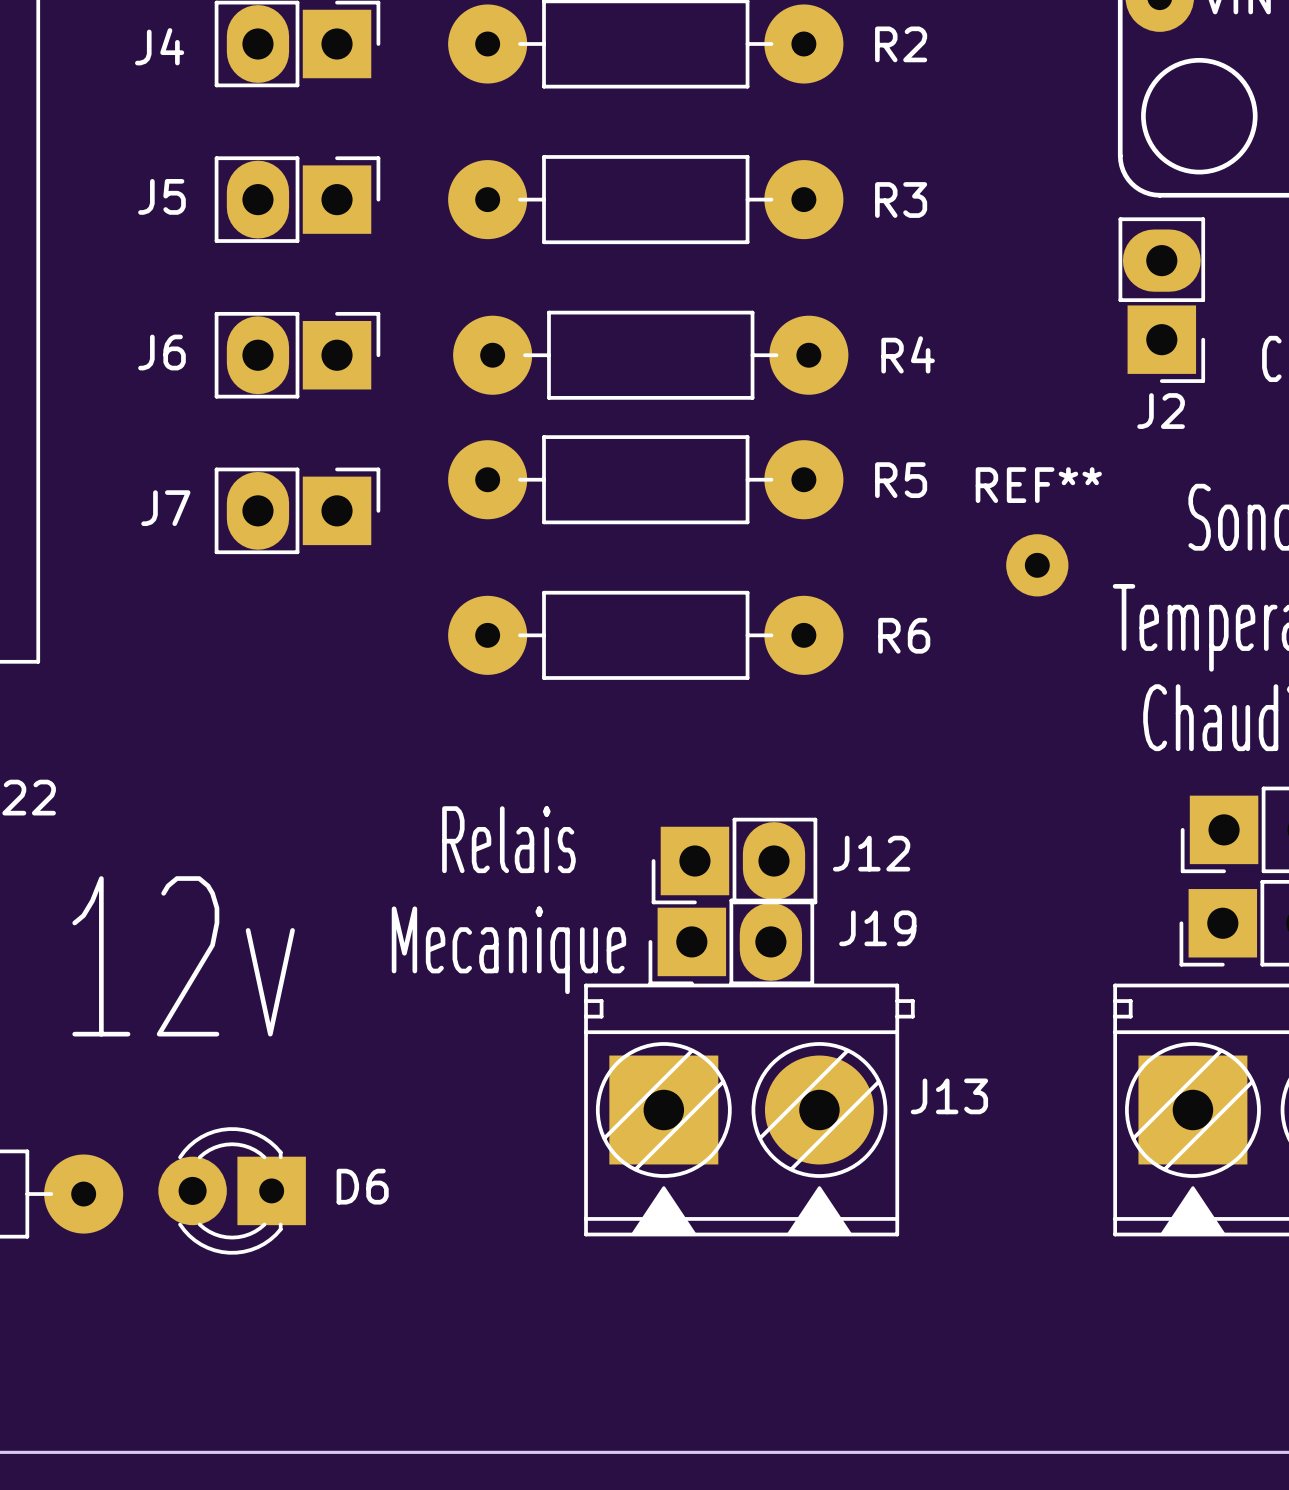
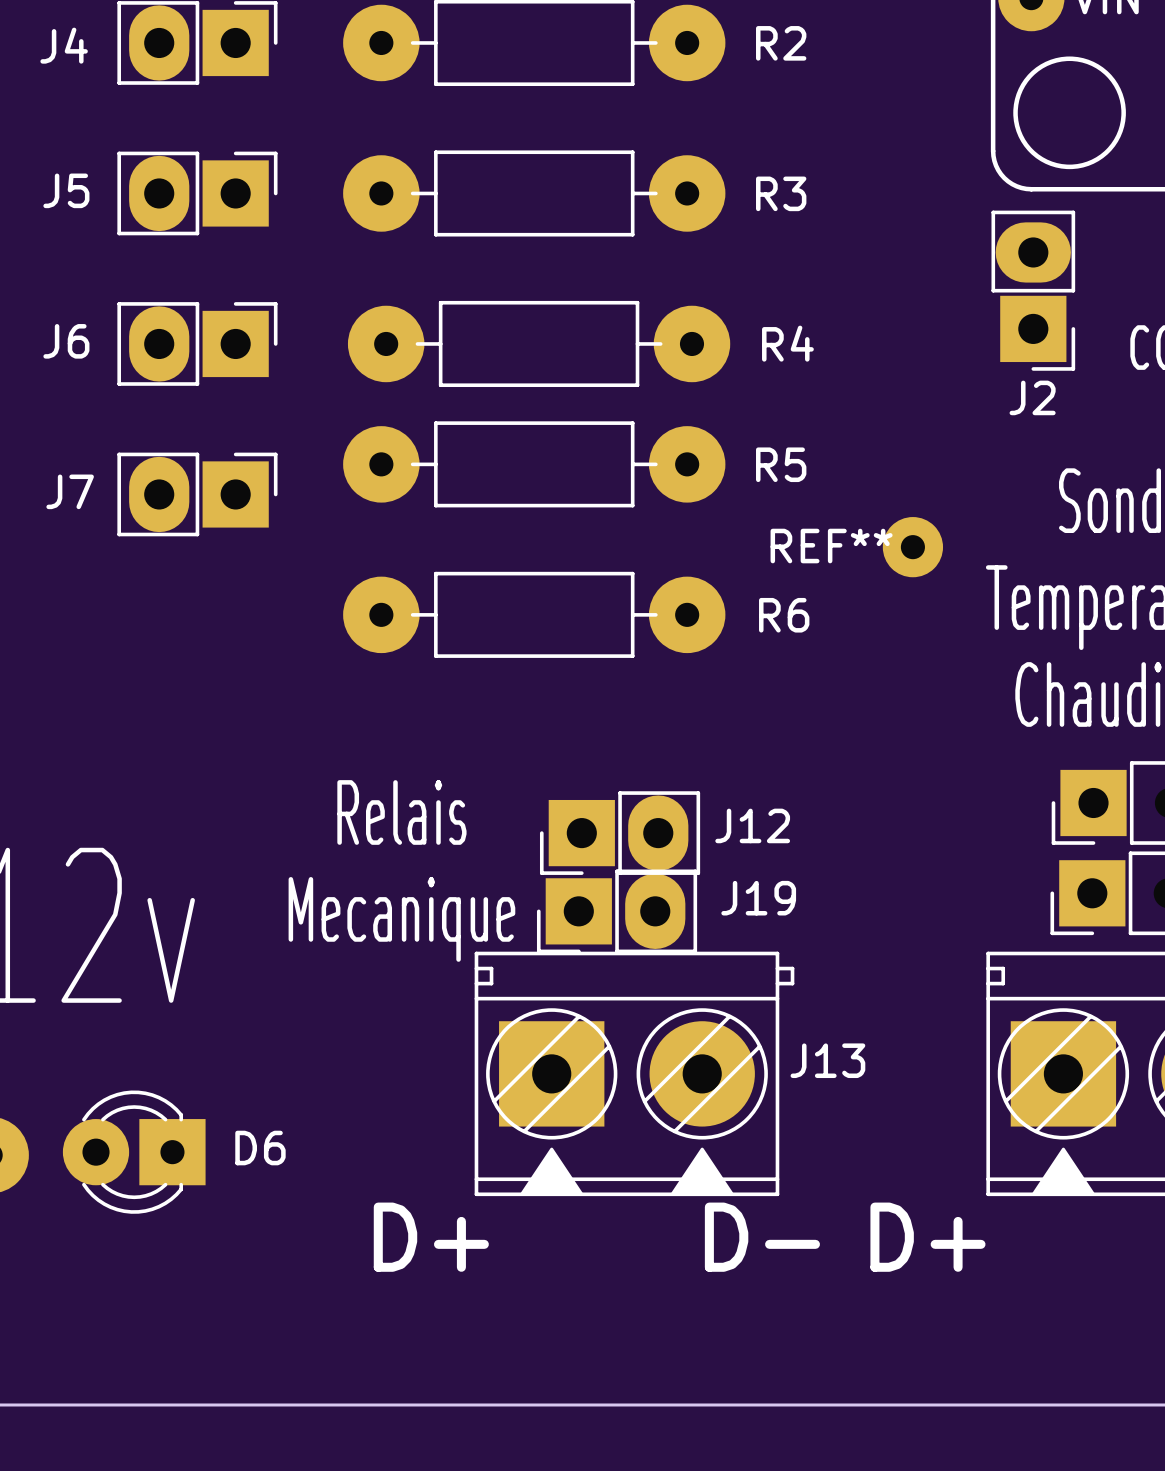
REF** name position: REF** (1038, 485) -> REF** (831, 546)
text: none -> D+ (431, 1237)
text: none -> D- (762, 1237)
text: none -> D+ (927, 1237)

